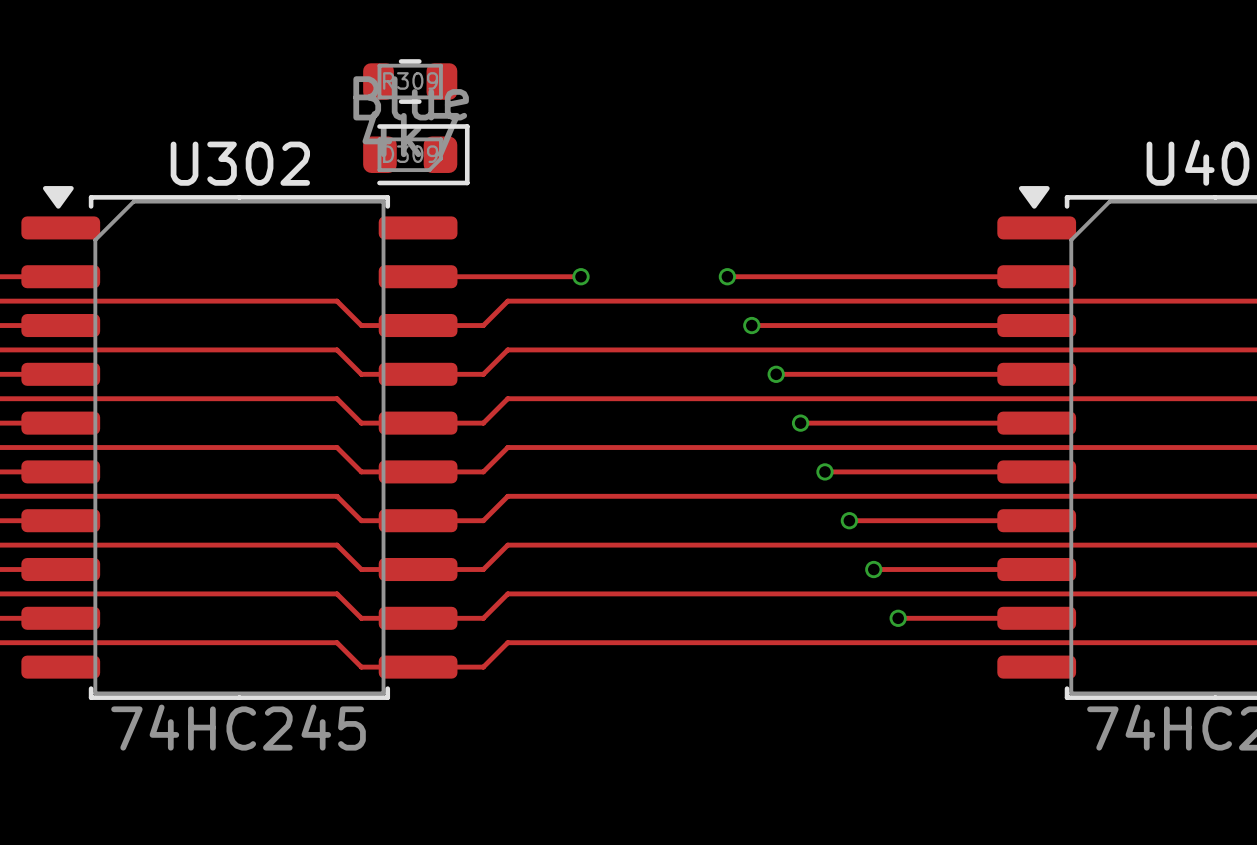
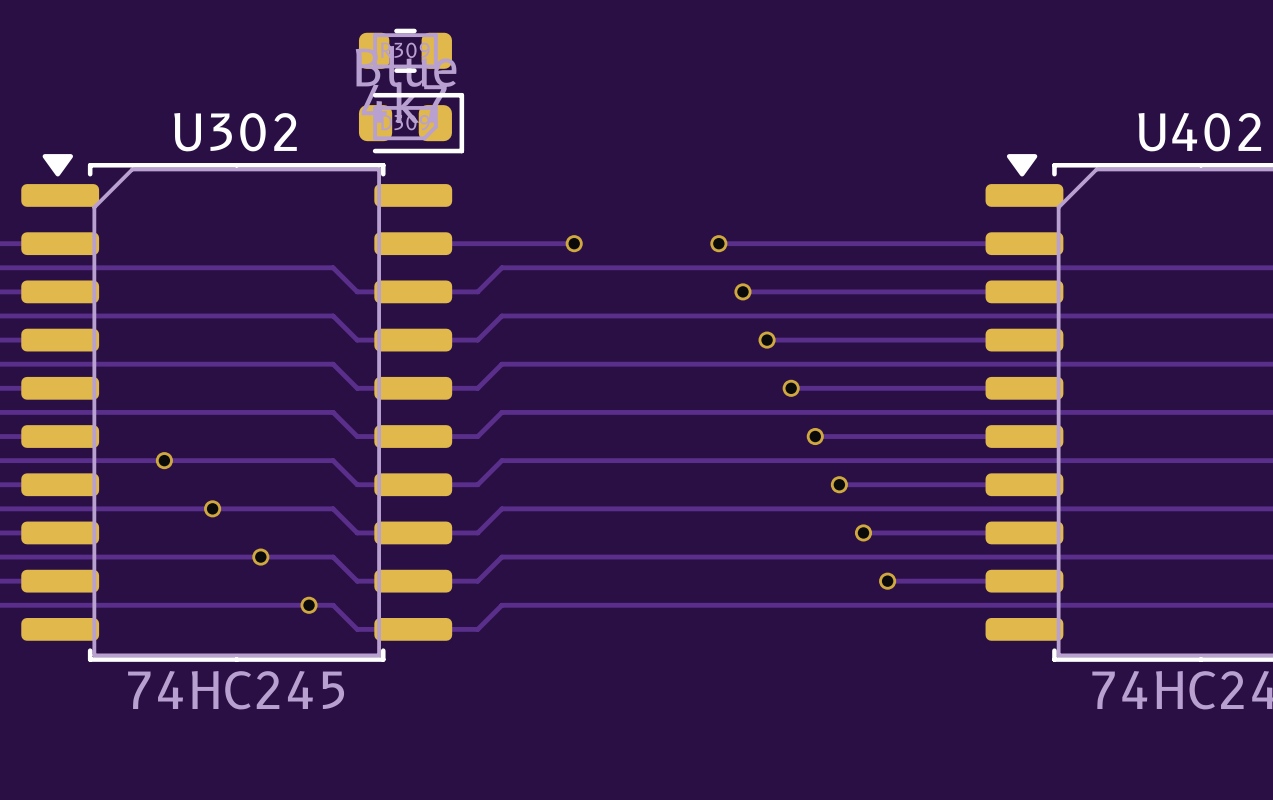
via: none -> (164, 460)
via: none -> (212, 508)
via: none -> (260, 557)
via: none -> (309, 605)

